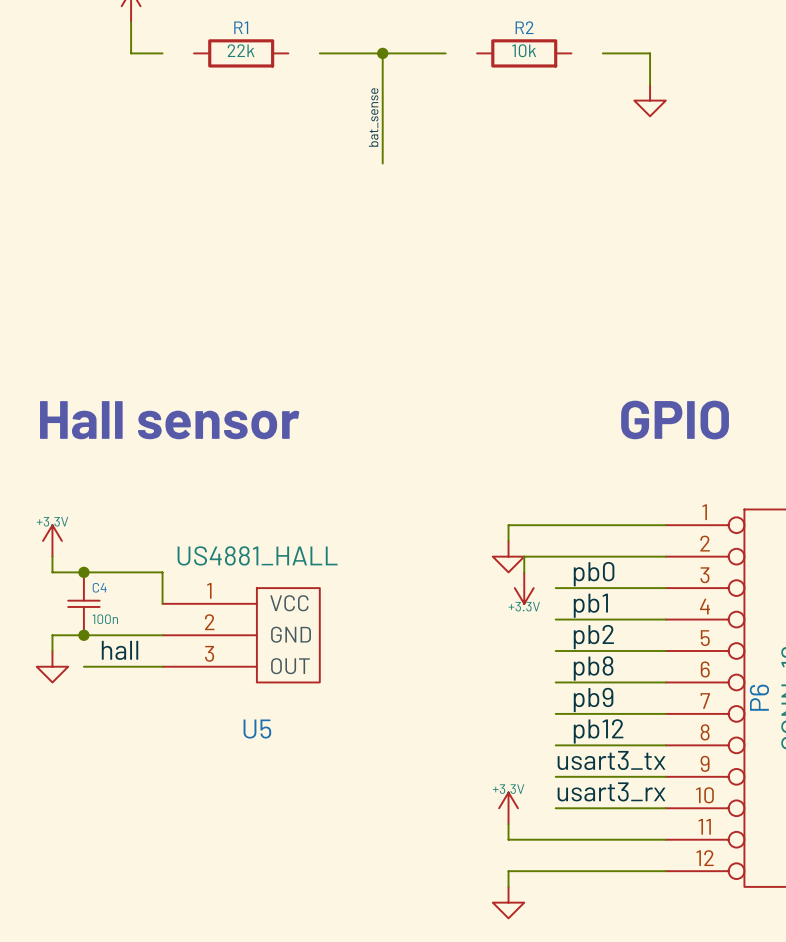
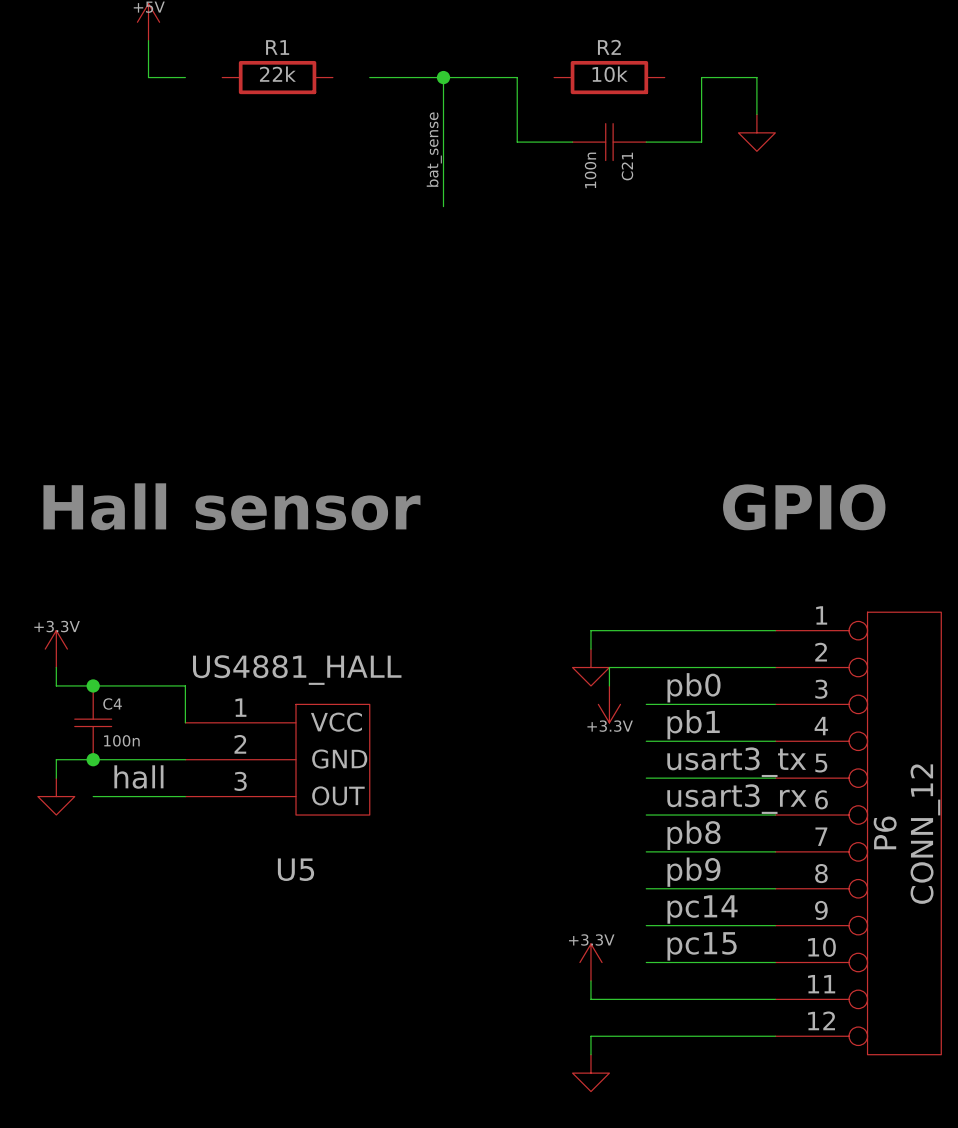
wire: none -> (517, 77) (517, 142) (572, 142)
wire: none -> (701, 77) (701, 142) (646, 142)
C21: none -> 100n (609, 142)
label: pb2 (593, 637) -> usart3_tx (736, 762)
label: pb8 (593, 668) -> usart3_rx (736, 799)
label: pb9 (593, 699) -> pb8 (693, 835)
label: pb12 (598, 731) -> pb9 (693, 872)
label: usart3_tx (611, 760) -> none
label: none -> pc14 (702, 909)
label: usart3_rx (611, 791) -> none
label: none -> pc15 (702, 946)

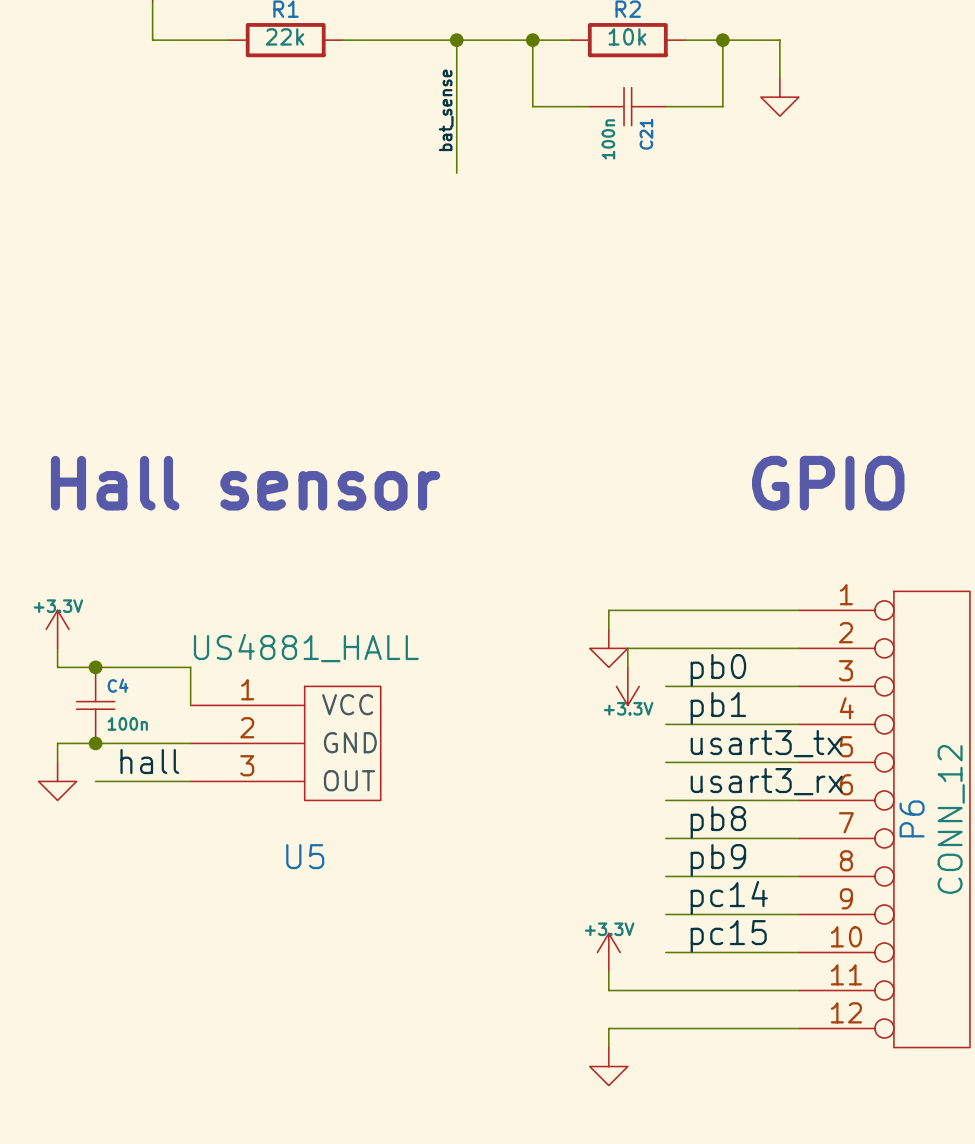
wire: none -> (190, 40) (228, 40)
wire: none -> (342, 40) (380, 40)
wire: none -> (532, 40) (570, 40)
junction: none -> (532, 40)
wire: none -> (684, 40) (722, 40)
junction: none -> (722, 40)

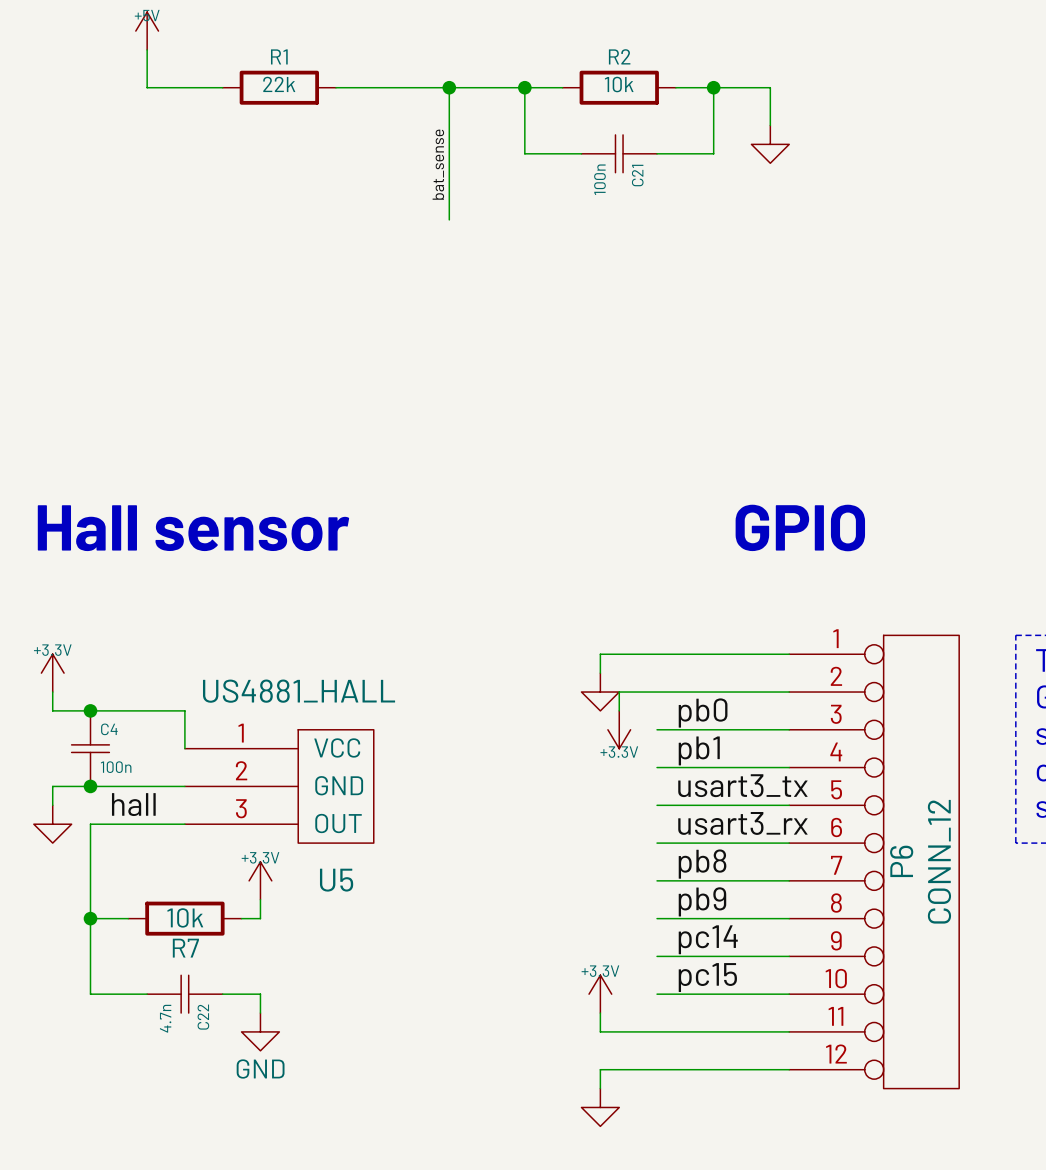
wire: none -> (90, 824) (90, 994) (147, 994)
power symbol: none -> +3.3V (260, 880)
U5 name position: U5 (305, 856) -> U5 (336, 880)
wire: none -> (260, 899) (260, 918) (241, 918)
wire: none -> (90, 918) (128, 918)
junction: none -> (90, 918)
R7: none -> 10k (184, 918)
C22: none -> 4.7n (184, 994)
wire: none -> (222, 994) (260, 994) (260, 1013)
power symbol: none -> GND (260, 1031)

